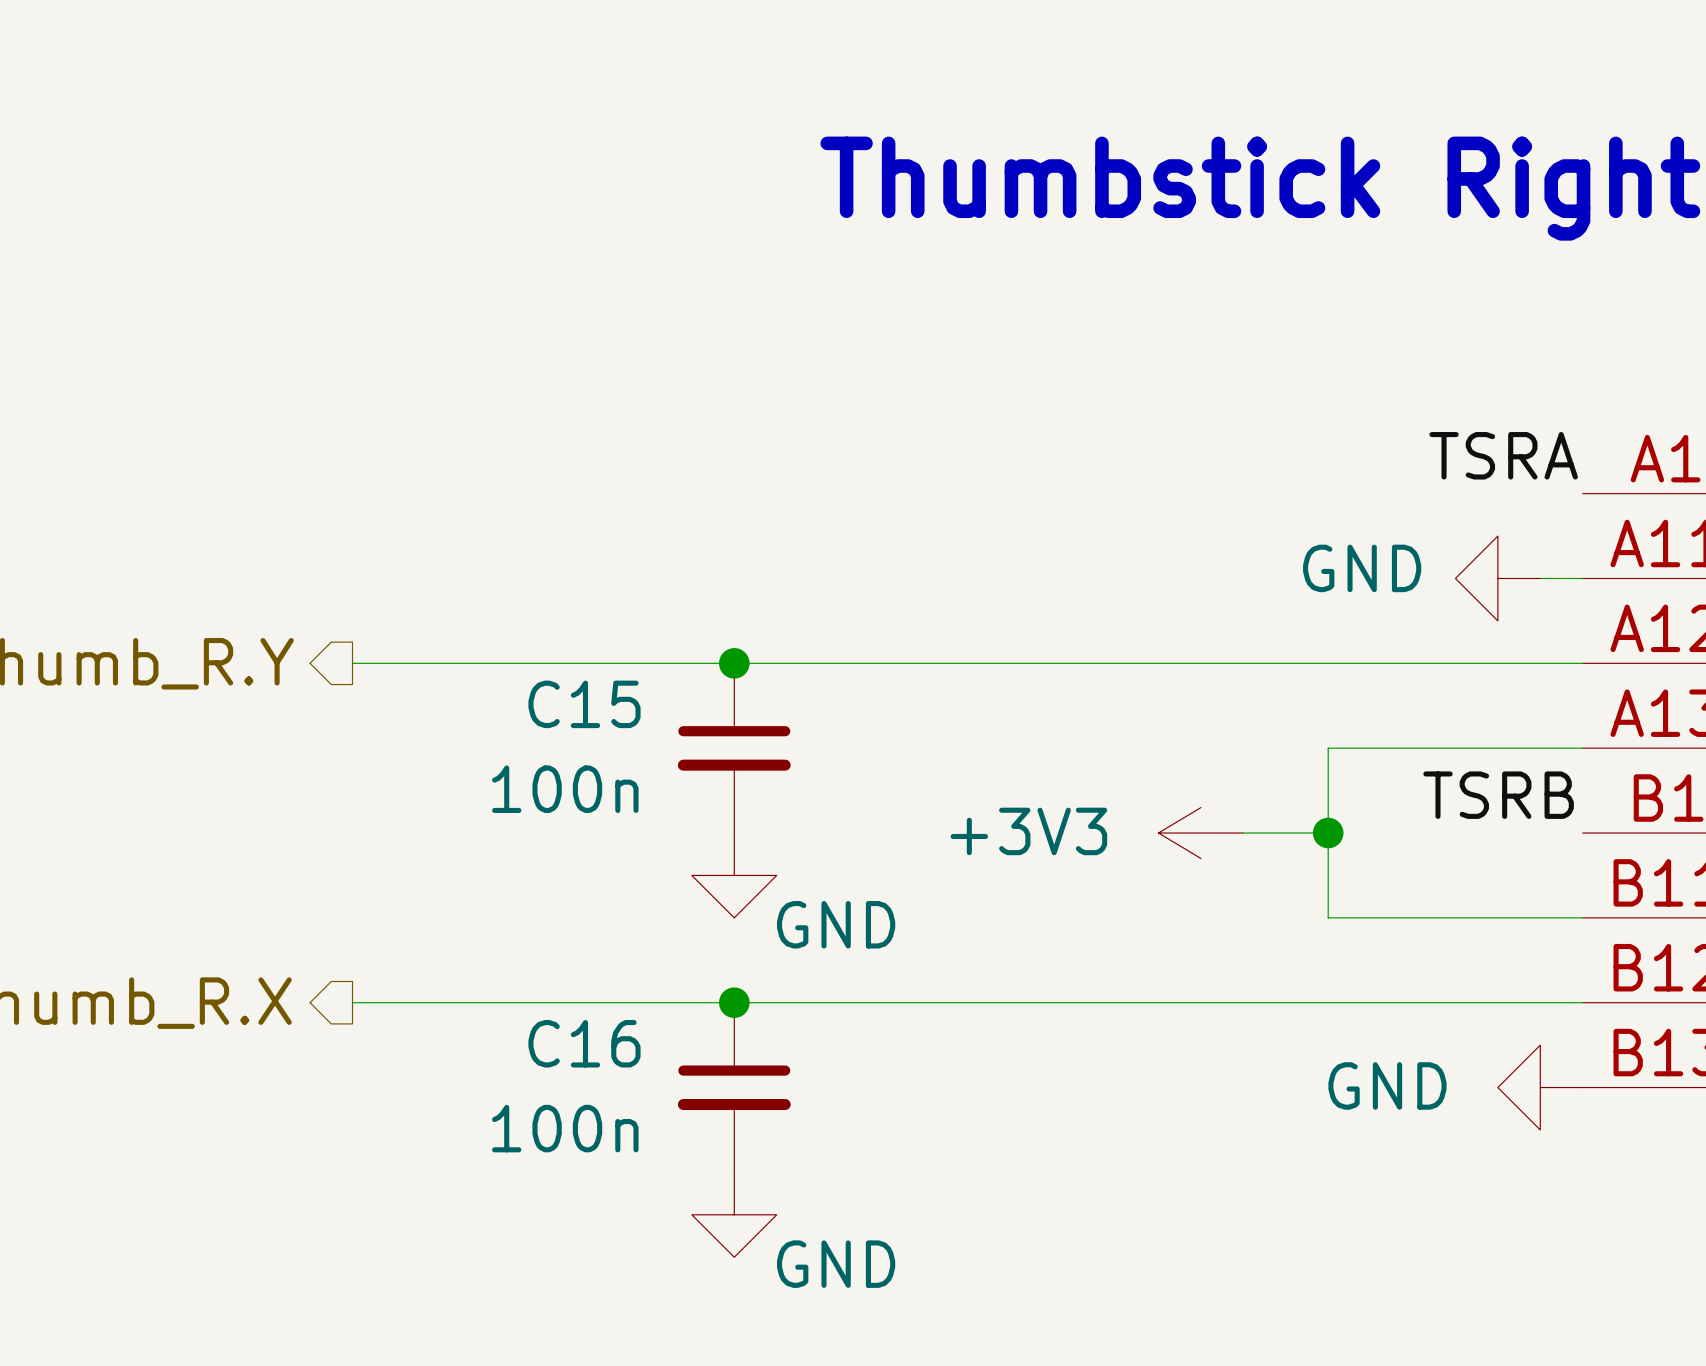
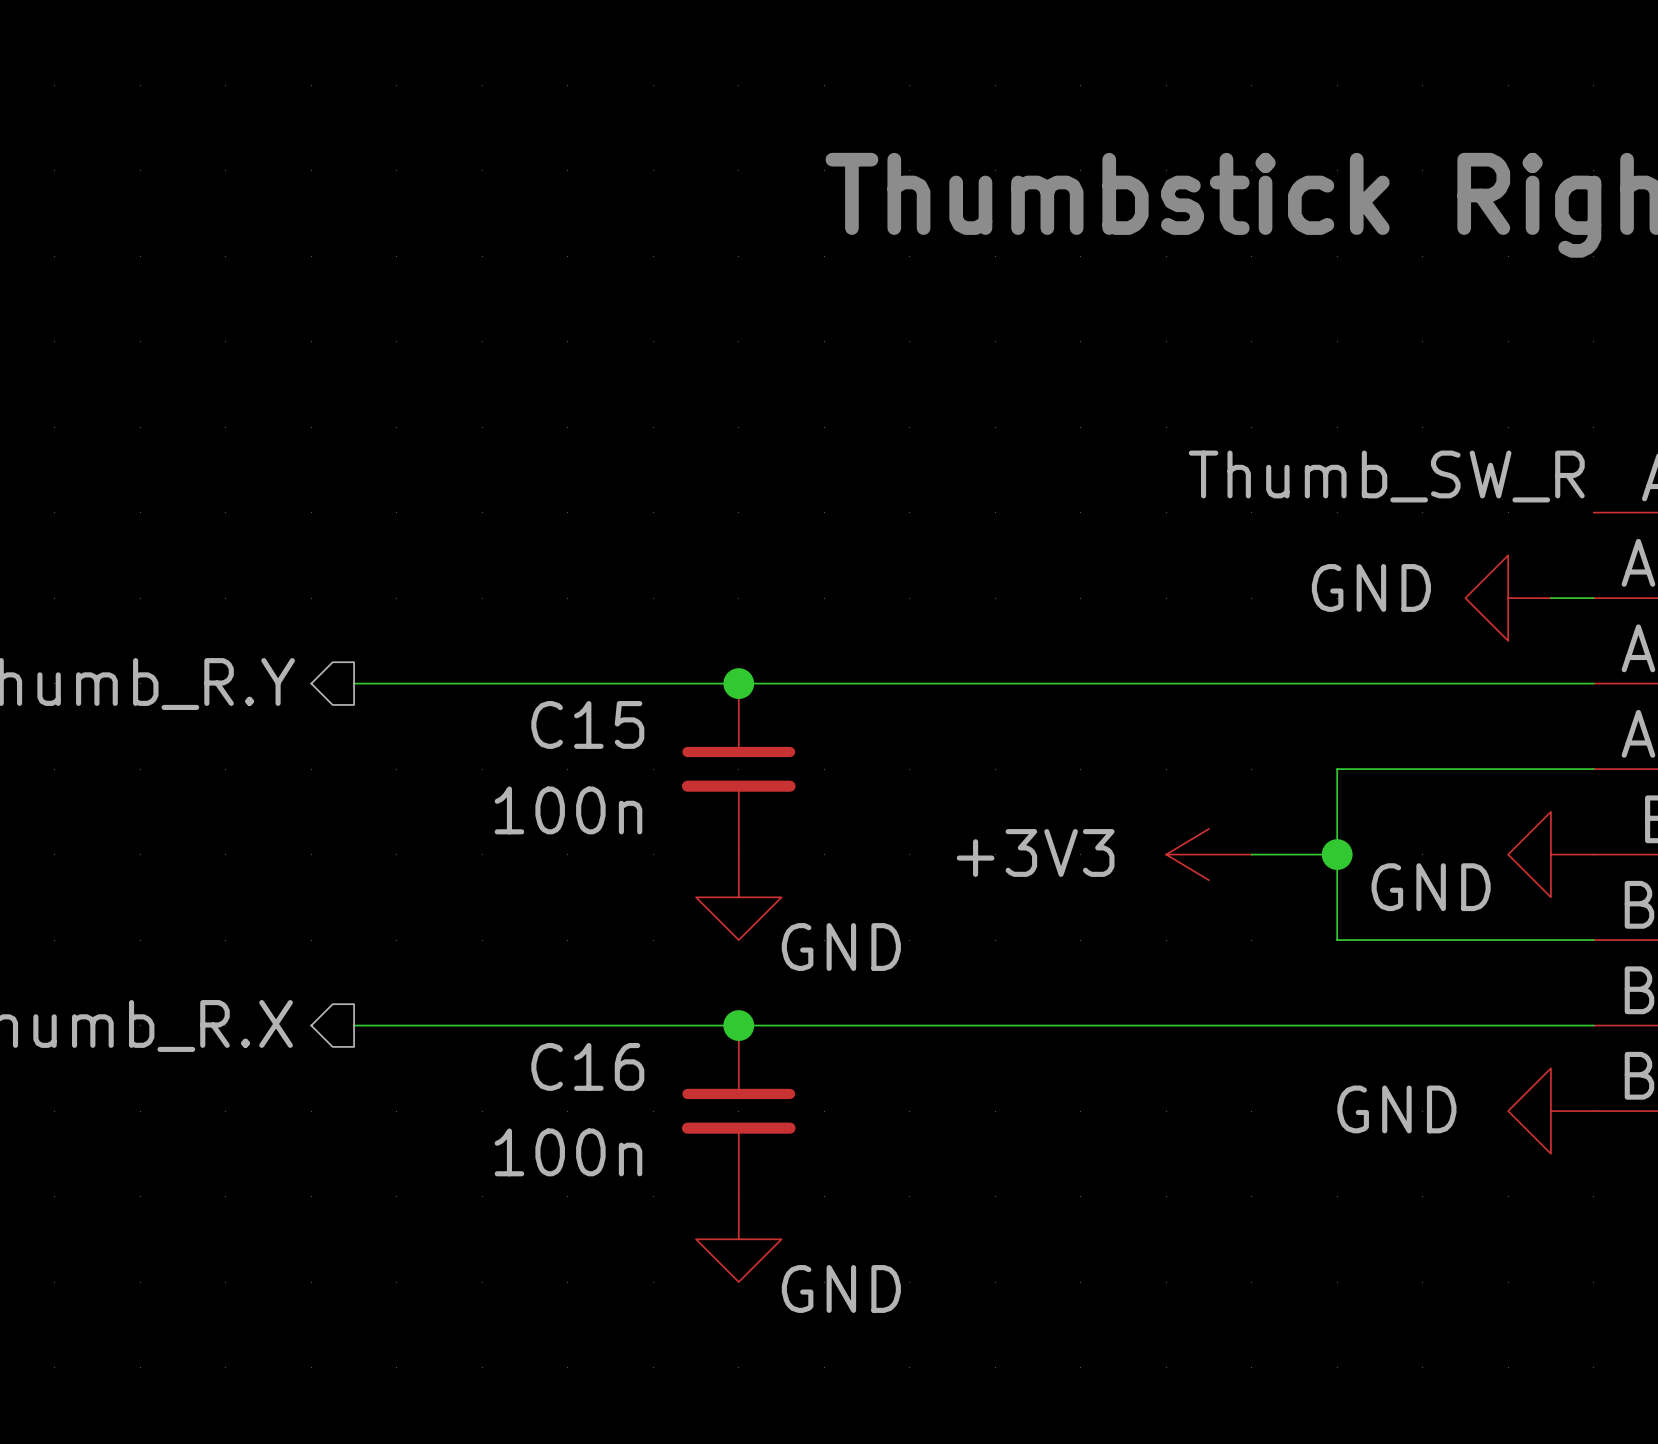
label: TSRA (1503, 455) -> Thumb_SW_R (1386, 476)
label: TSRB (1498, 795) -> none
power symbol: none -> GND (1550, 854)

